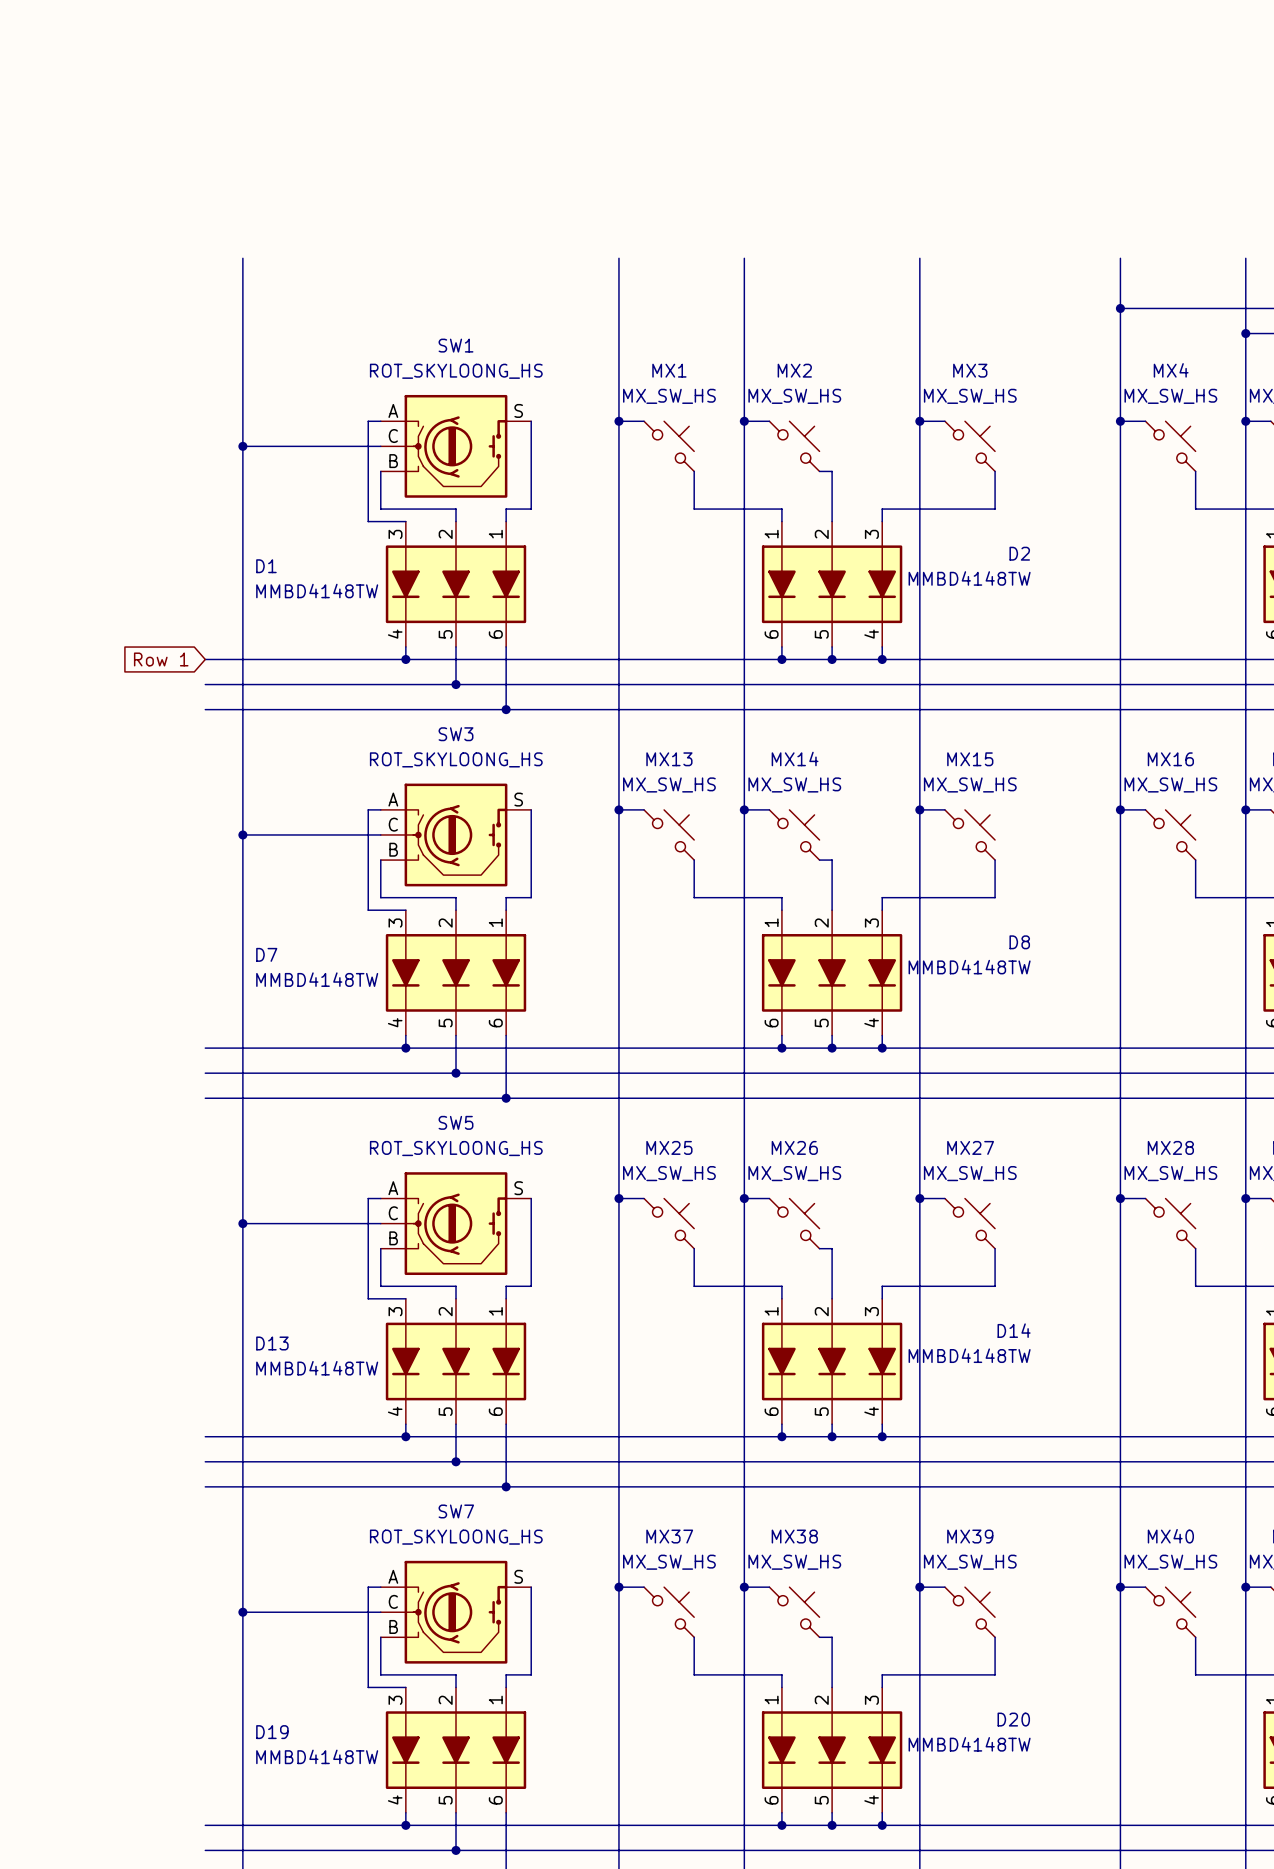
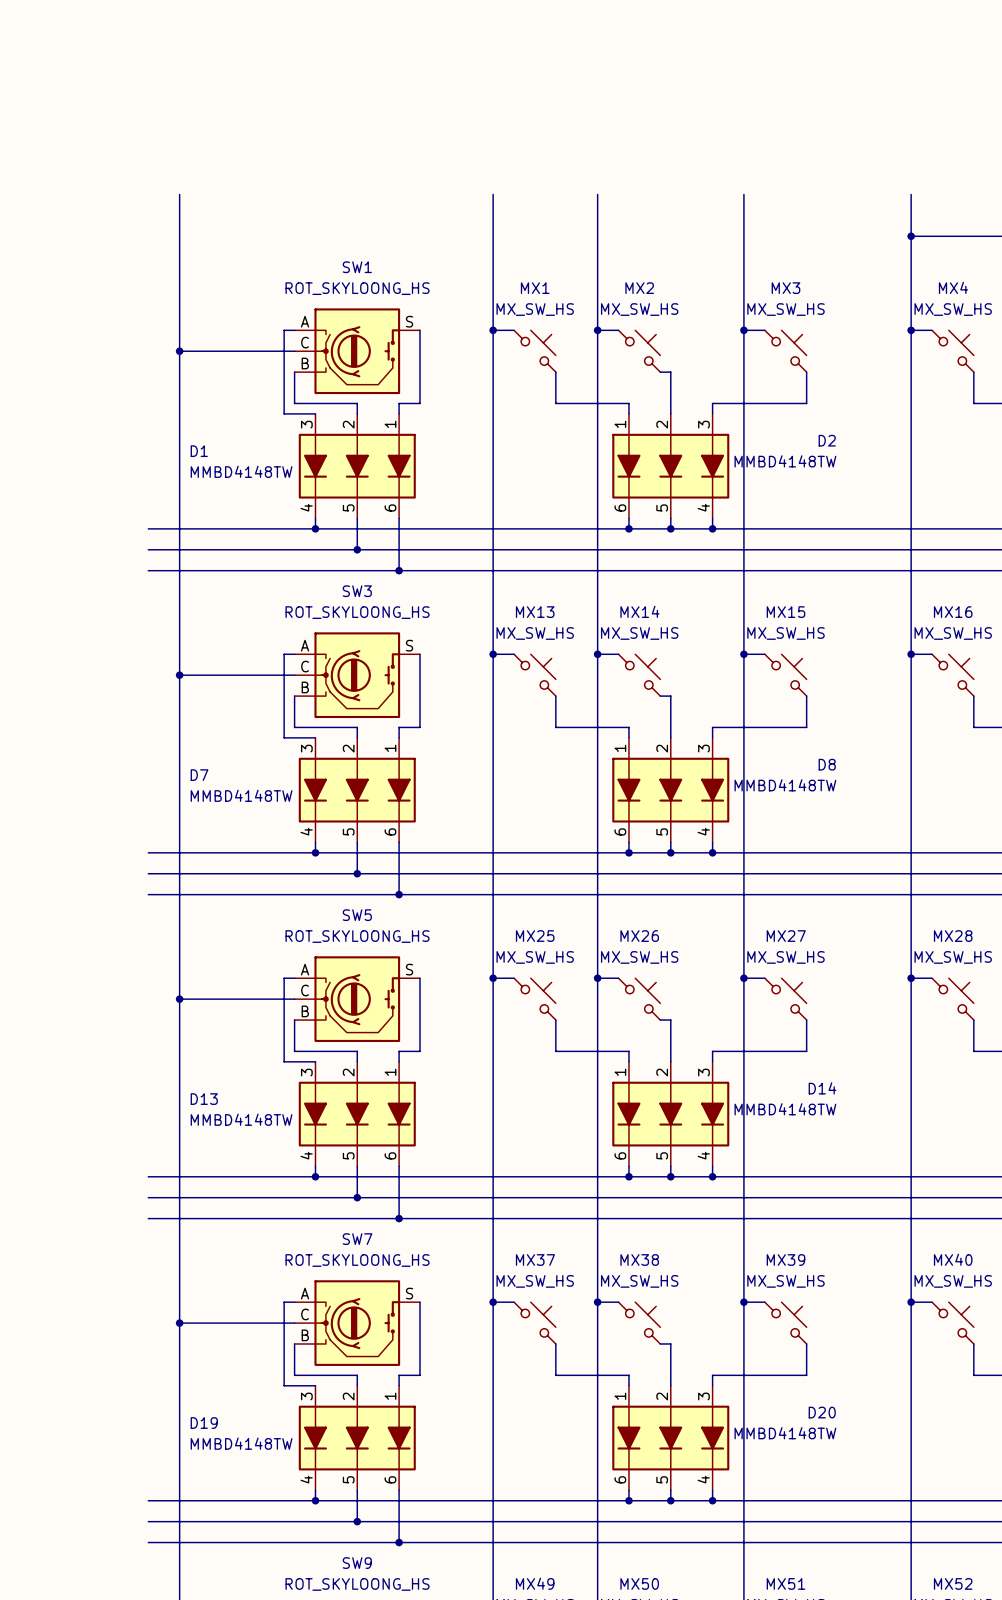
global label: Row 1 (161, 659) -> none

